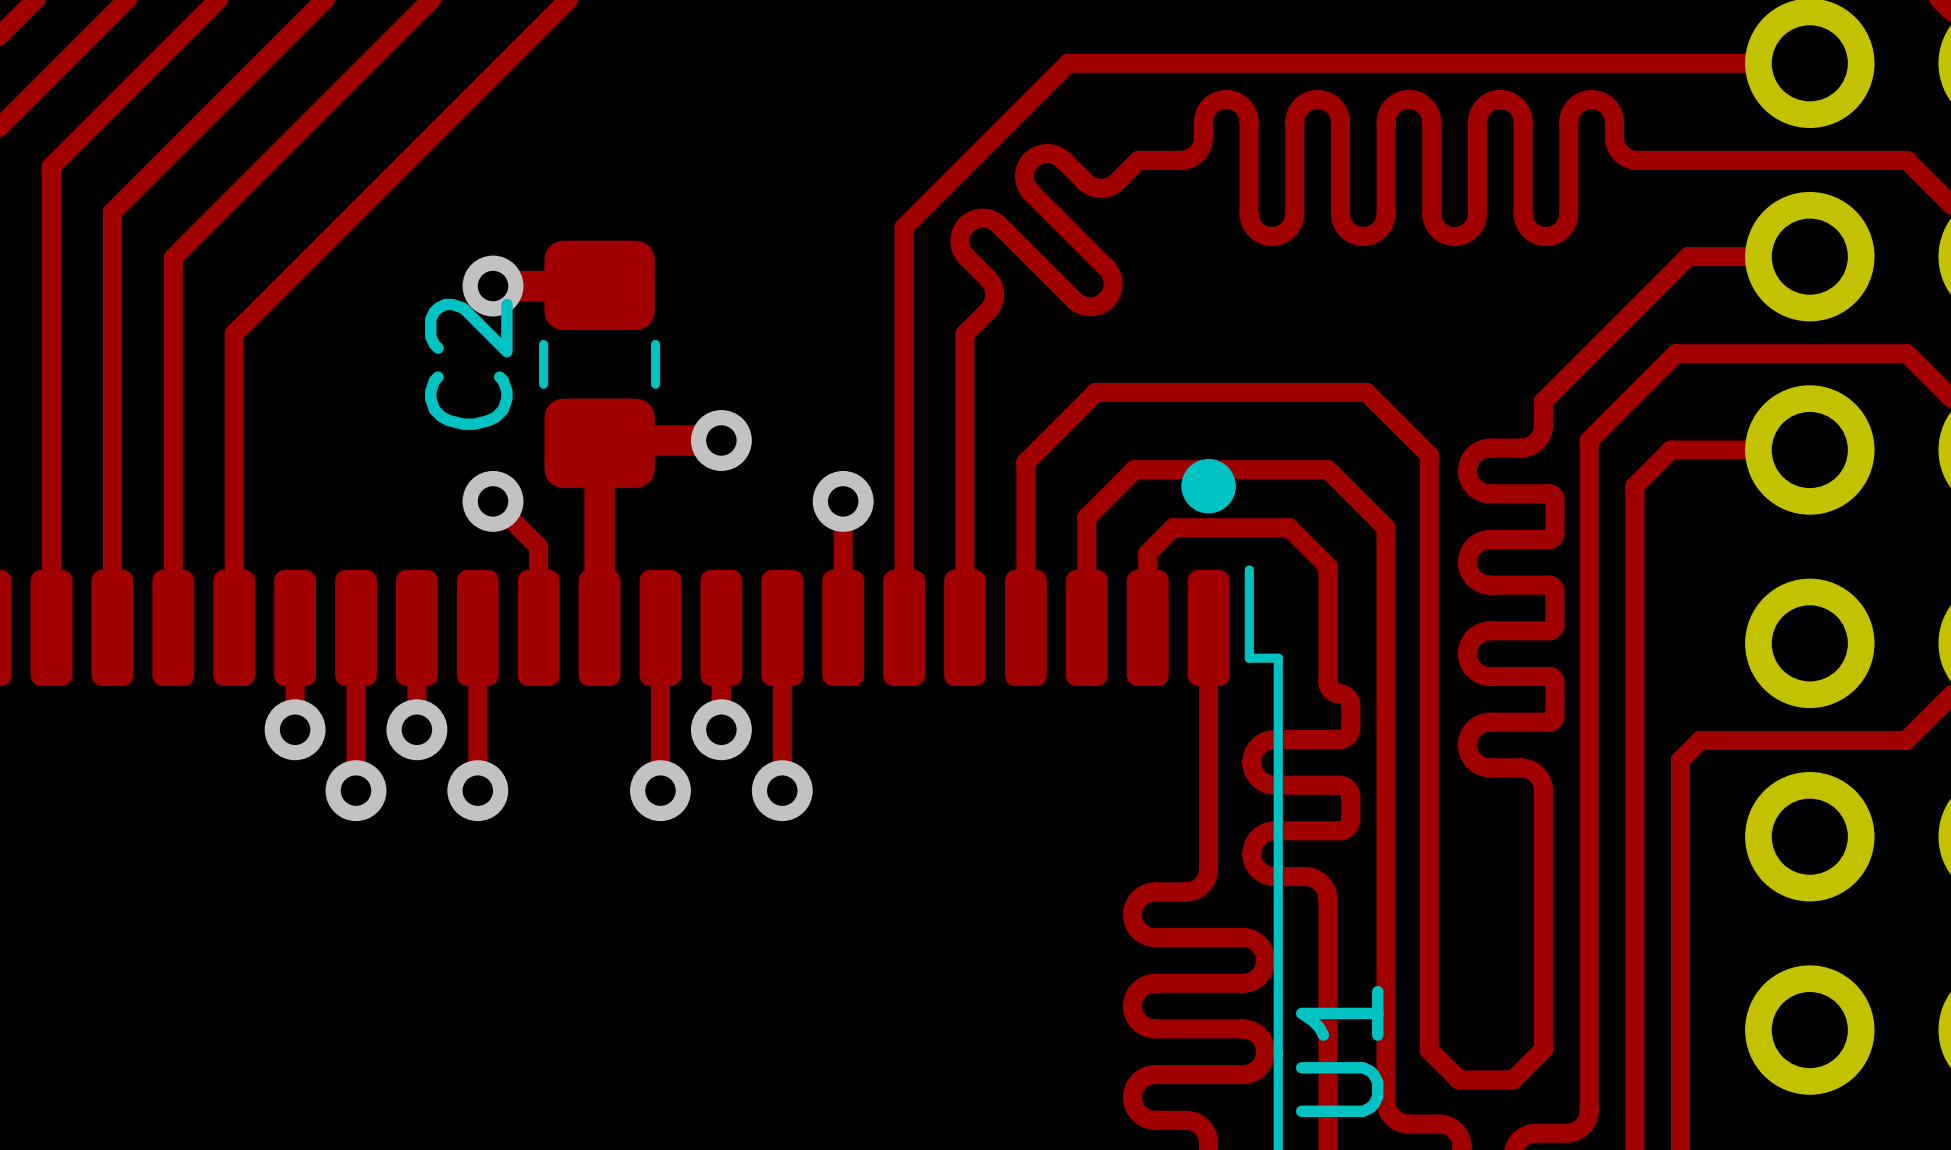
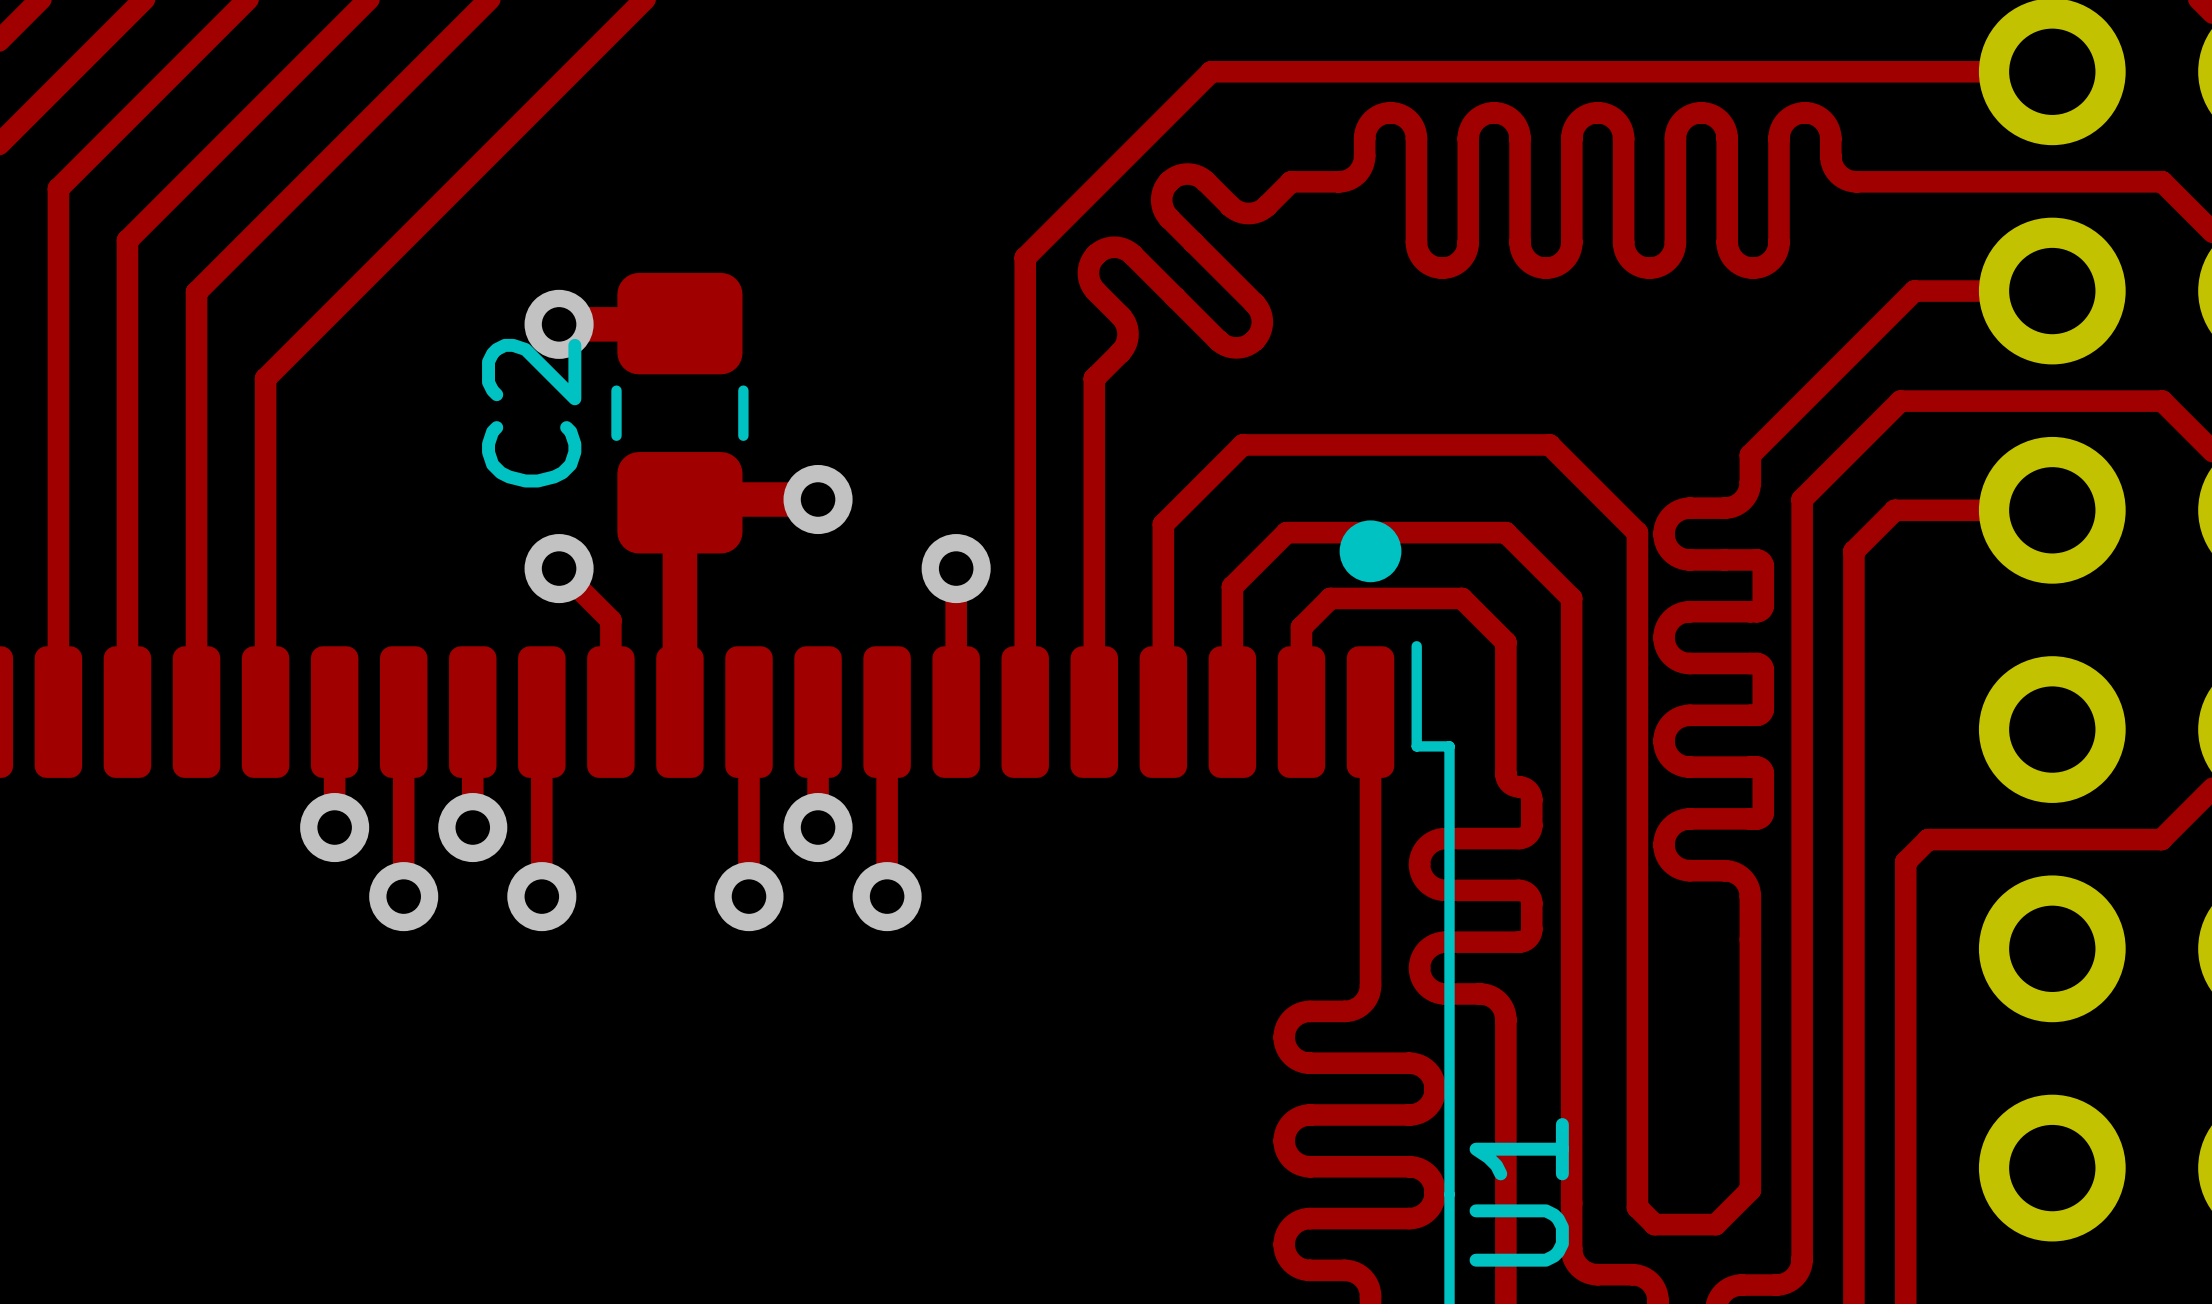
track: (1429, 455) (1429, 1050) (1443, 1064) -> (1620, 516) (1637, 532) (1637, 1207)

